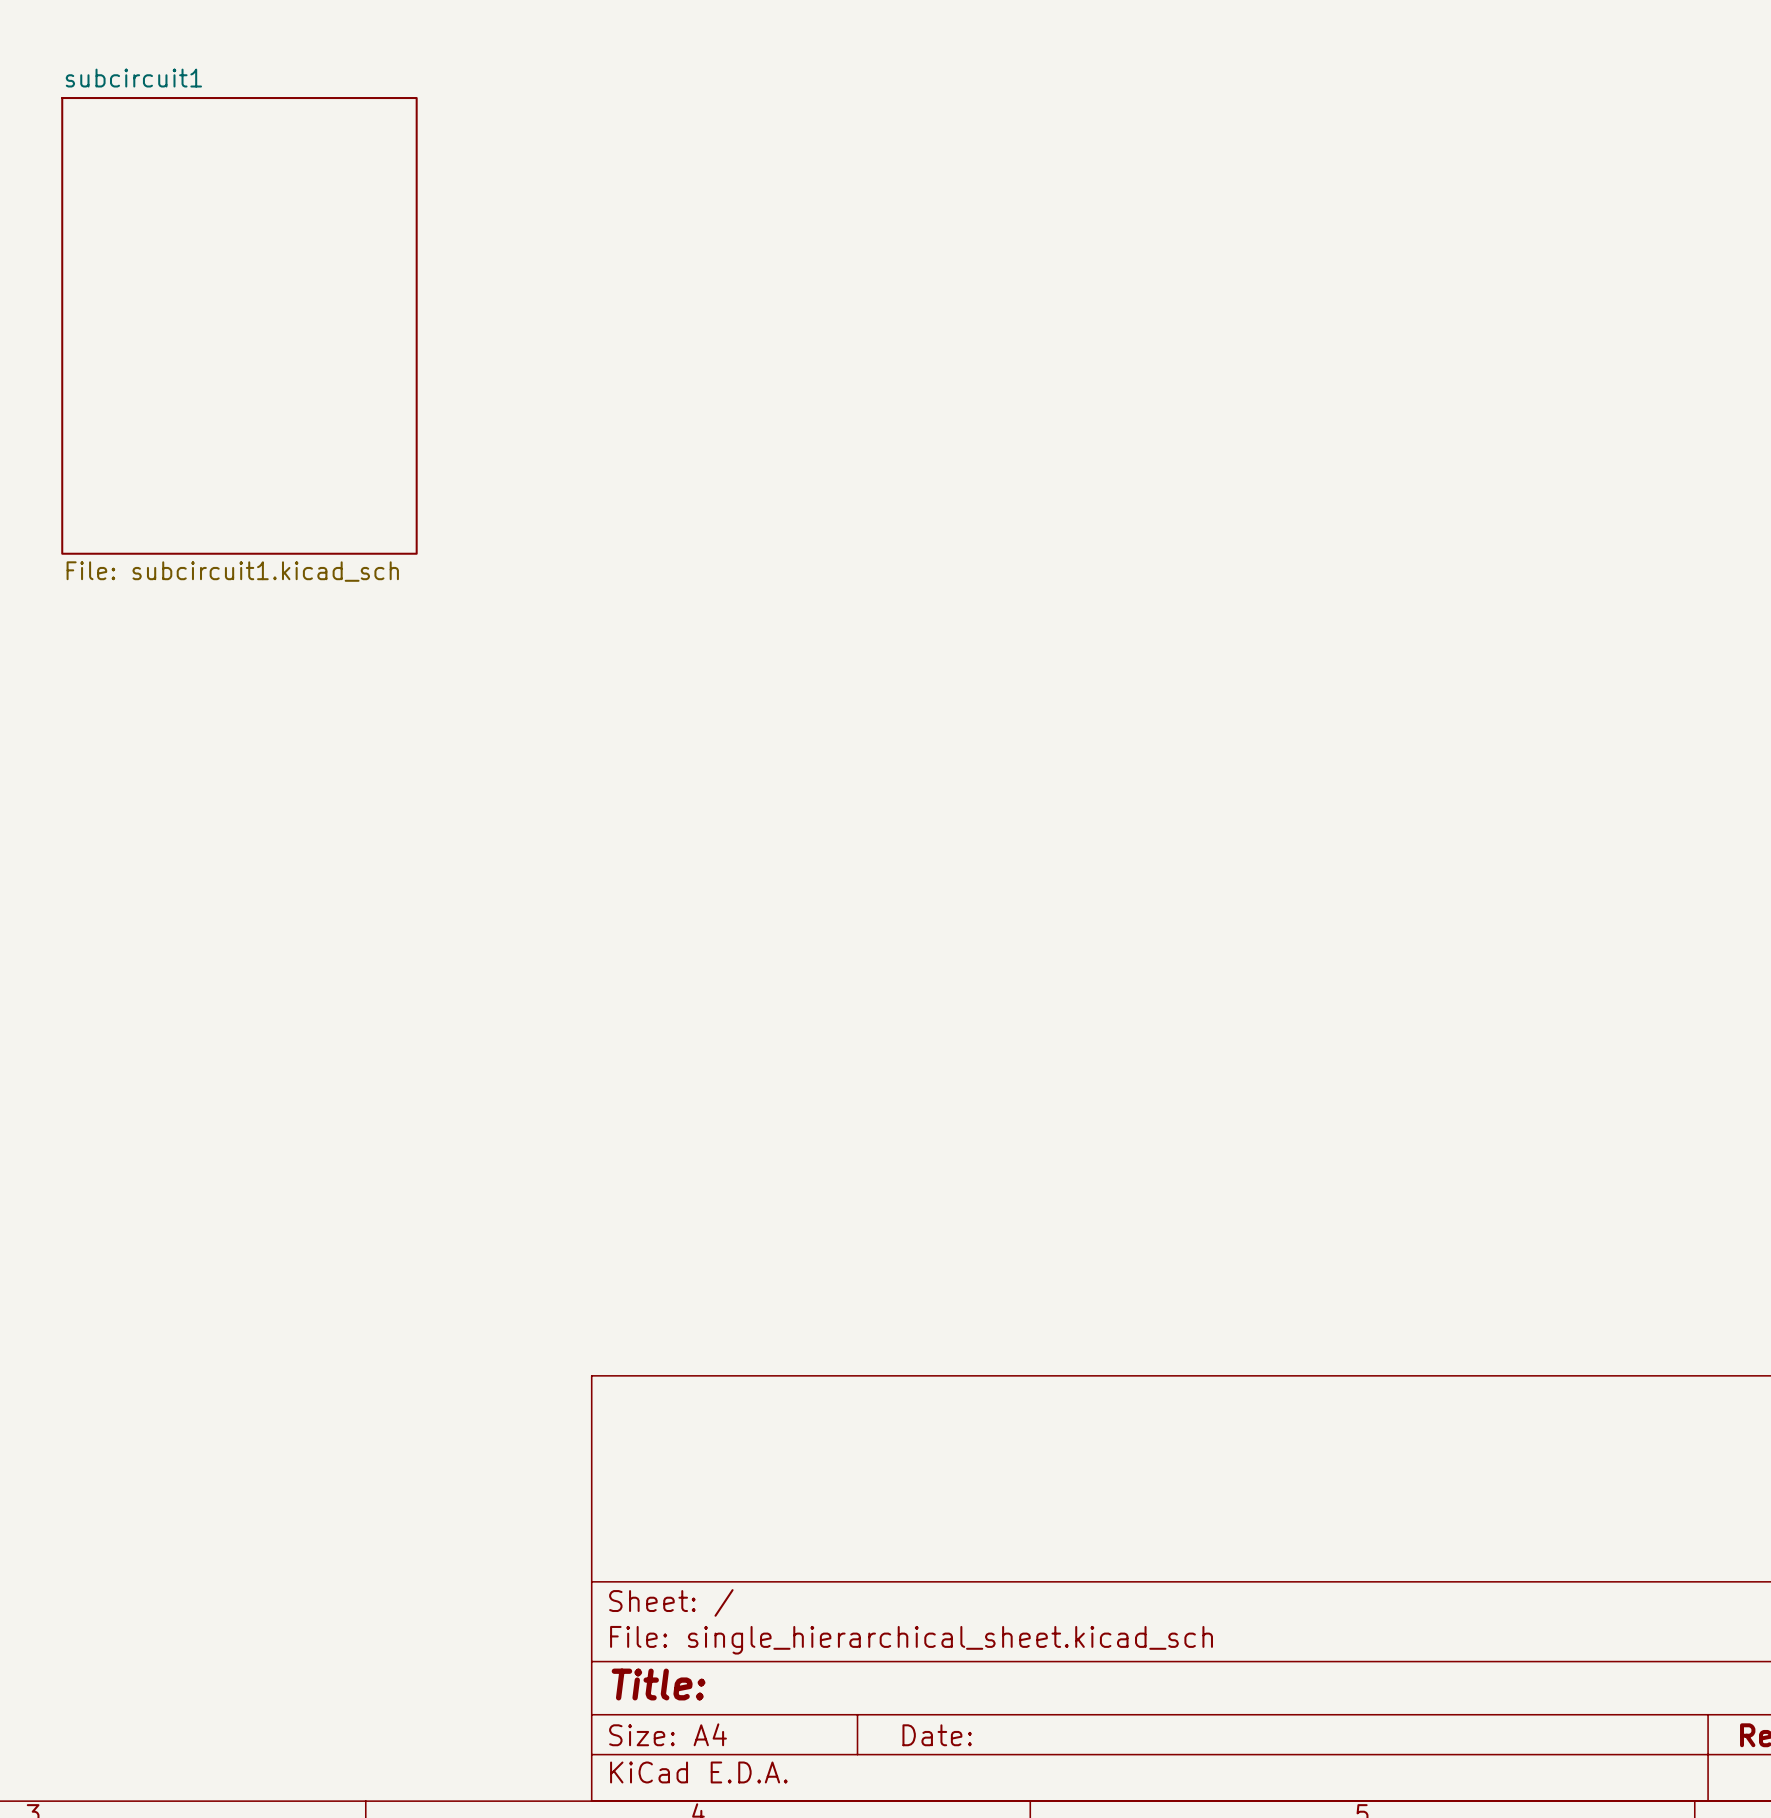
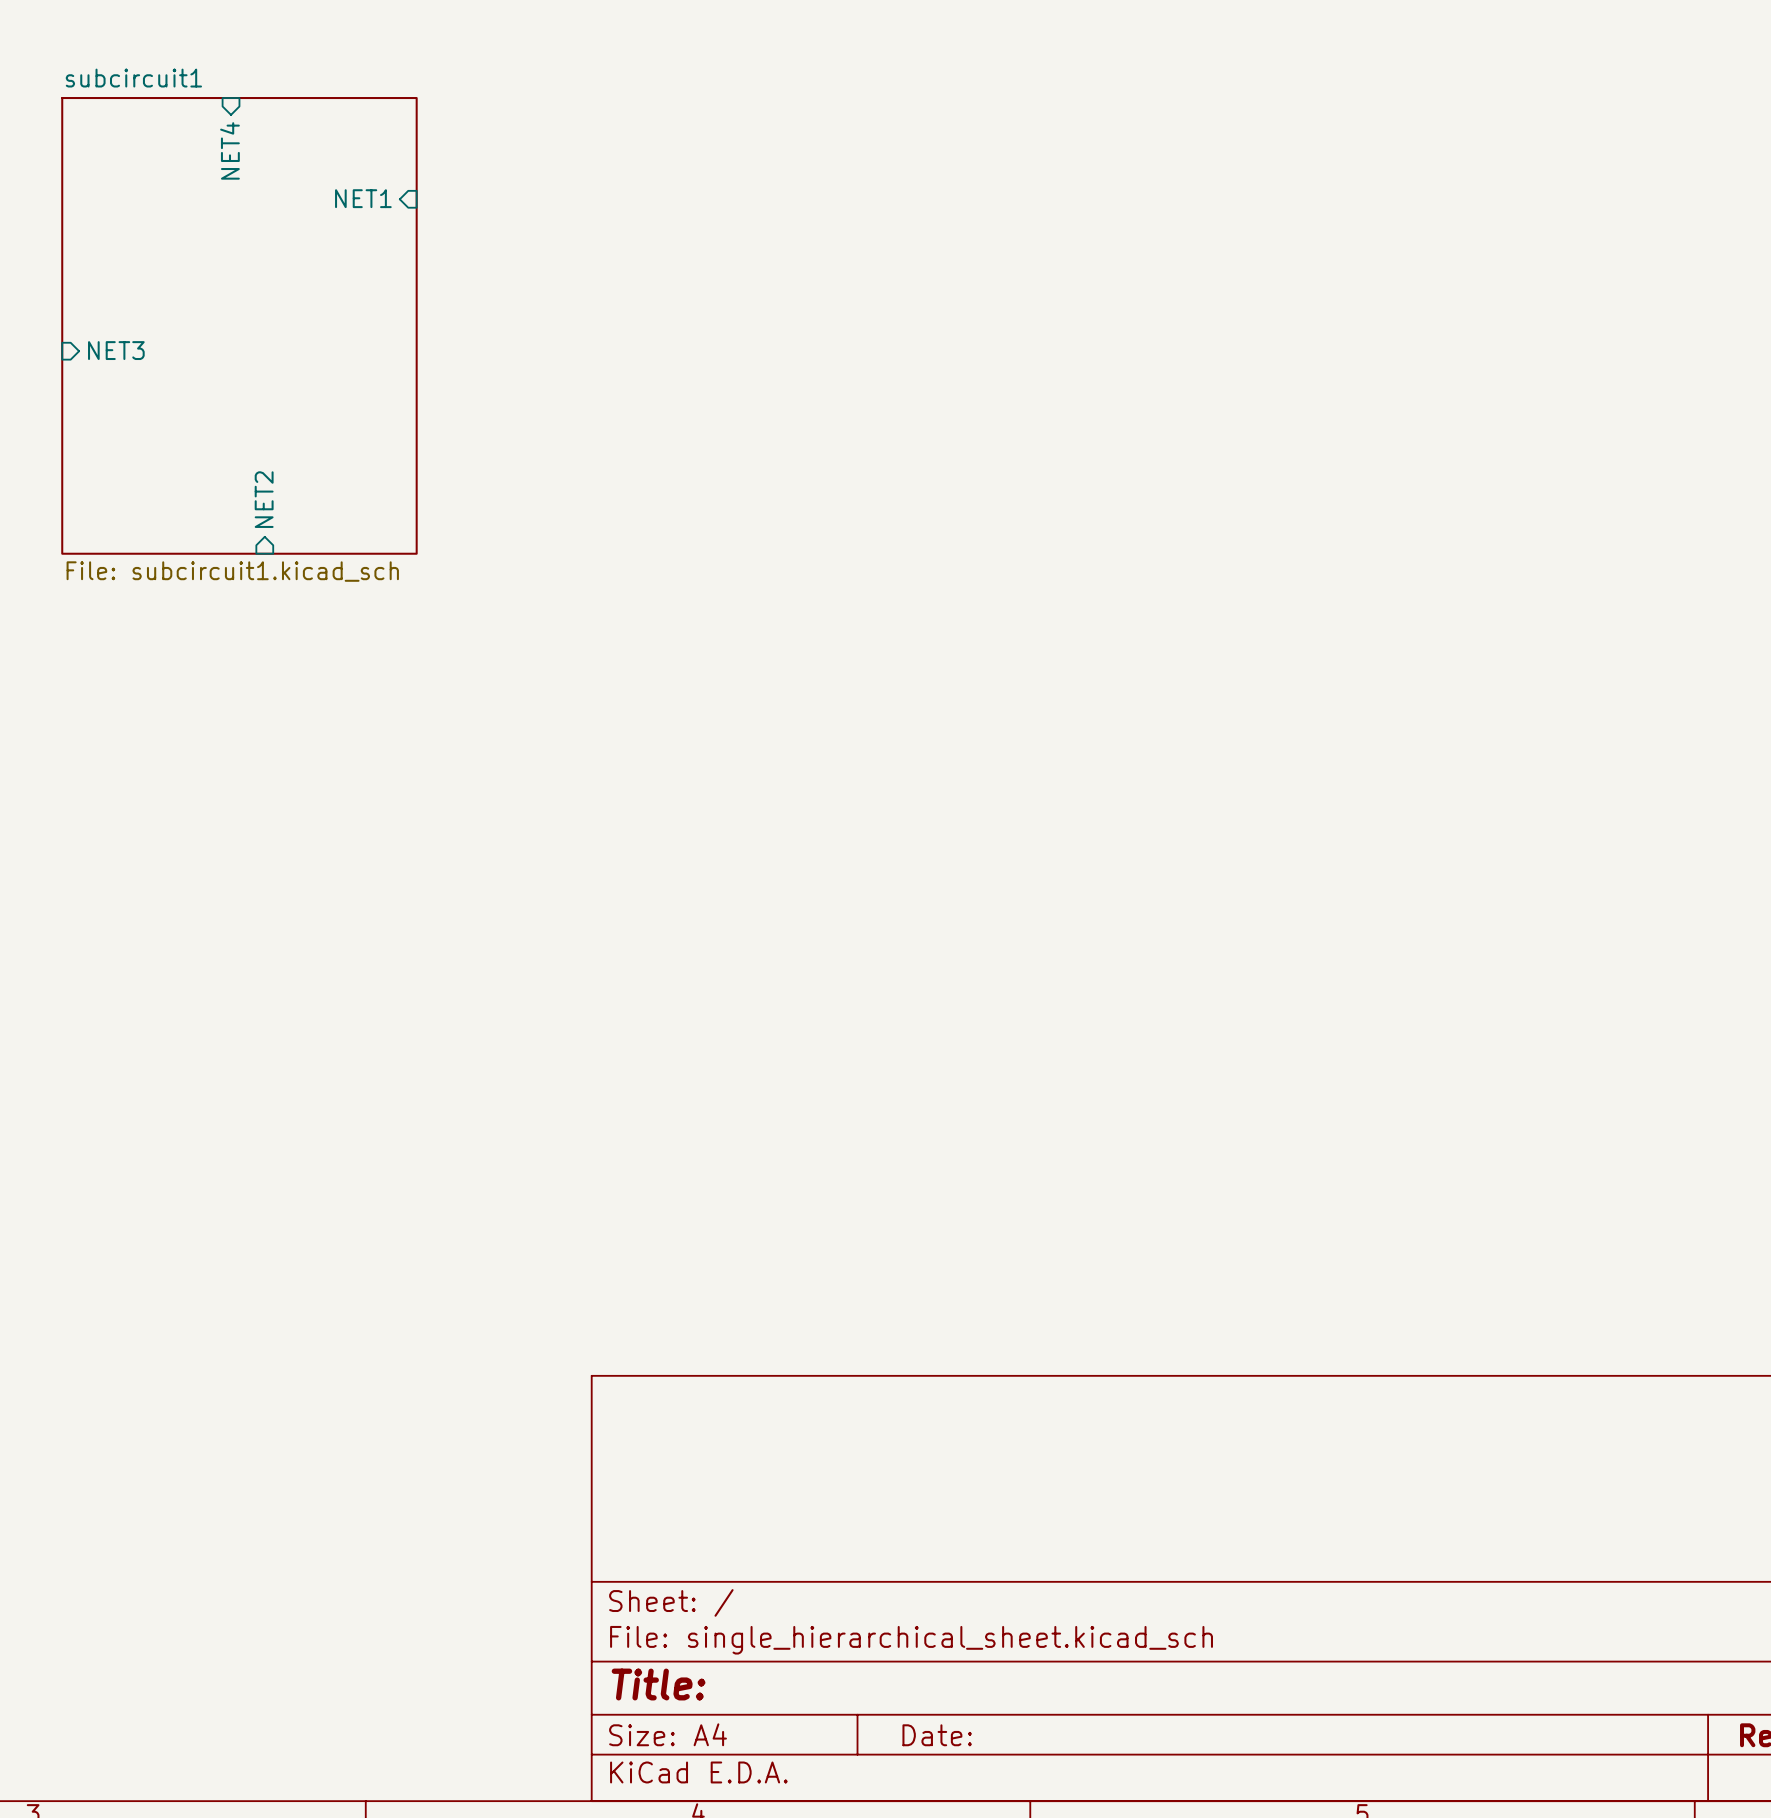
sheet pin: none -> NET4 (229, 150)
sheet pin: none -> NET1 (363, 198)
sheet pin: none -> NET3 (116, 350)
sheet pin: none -> NET2 (264, 499)

